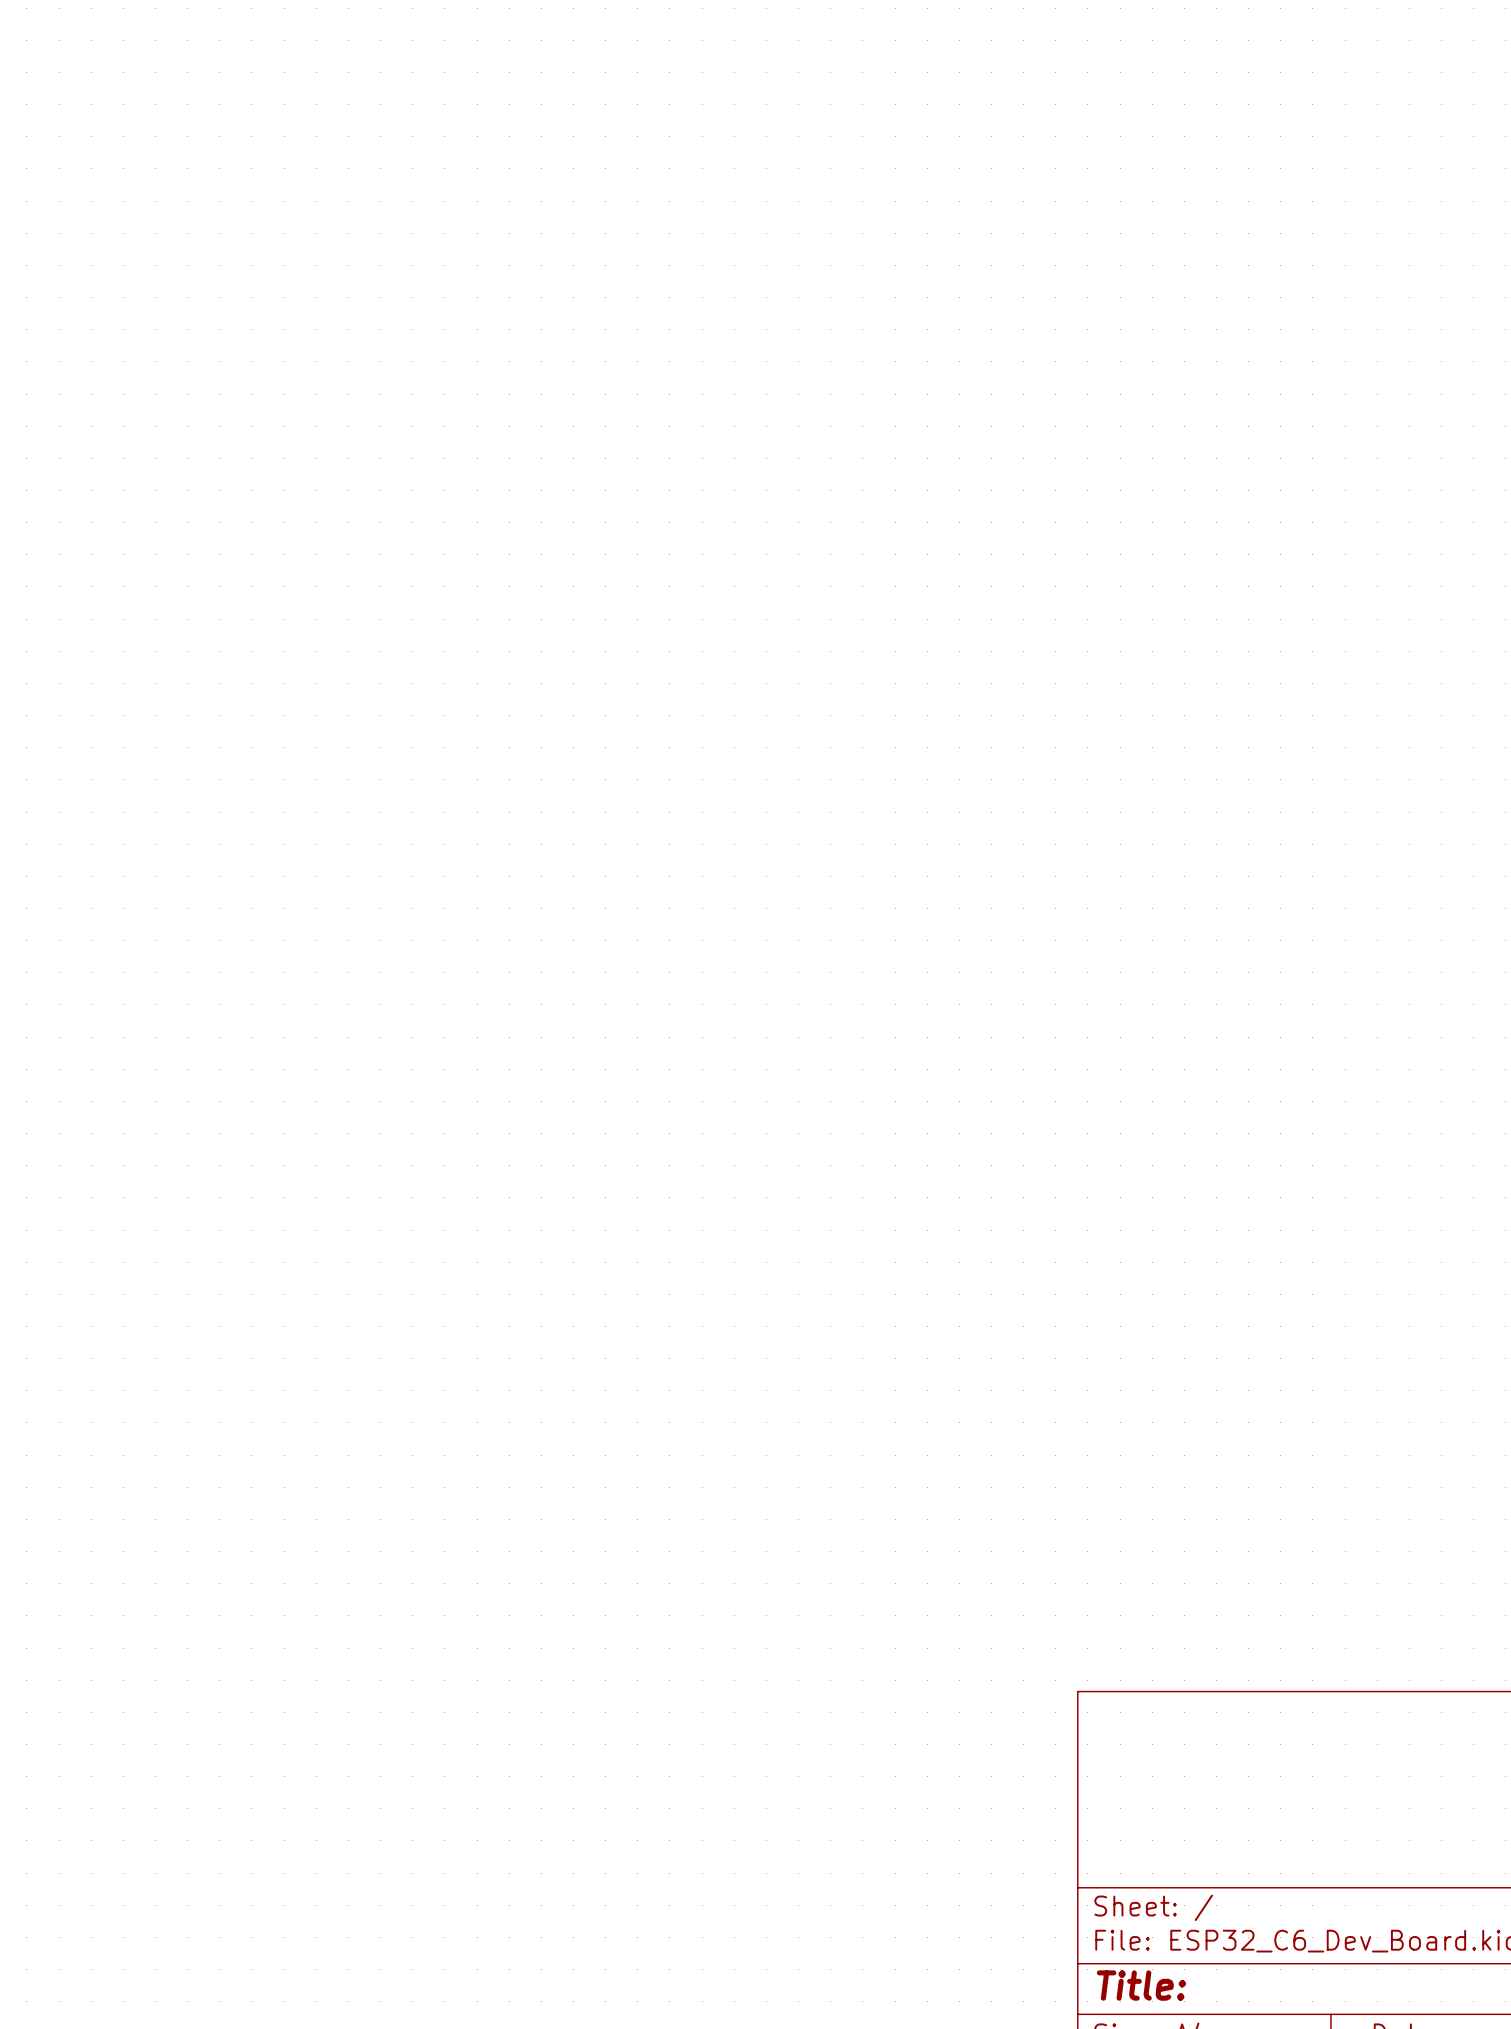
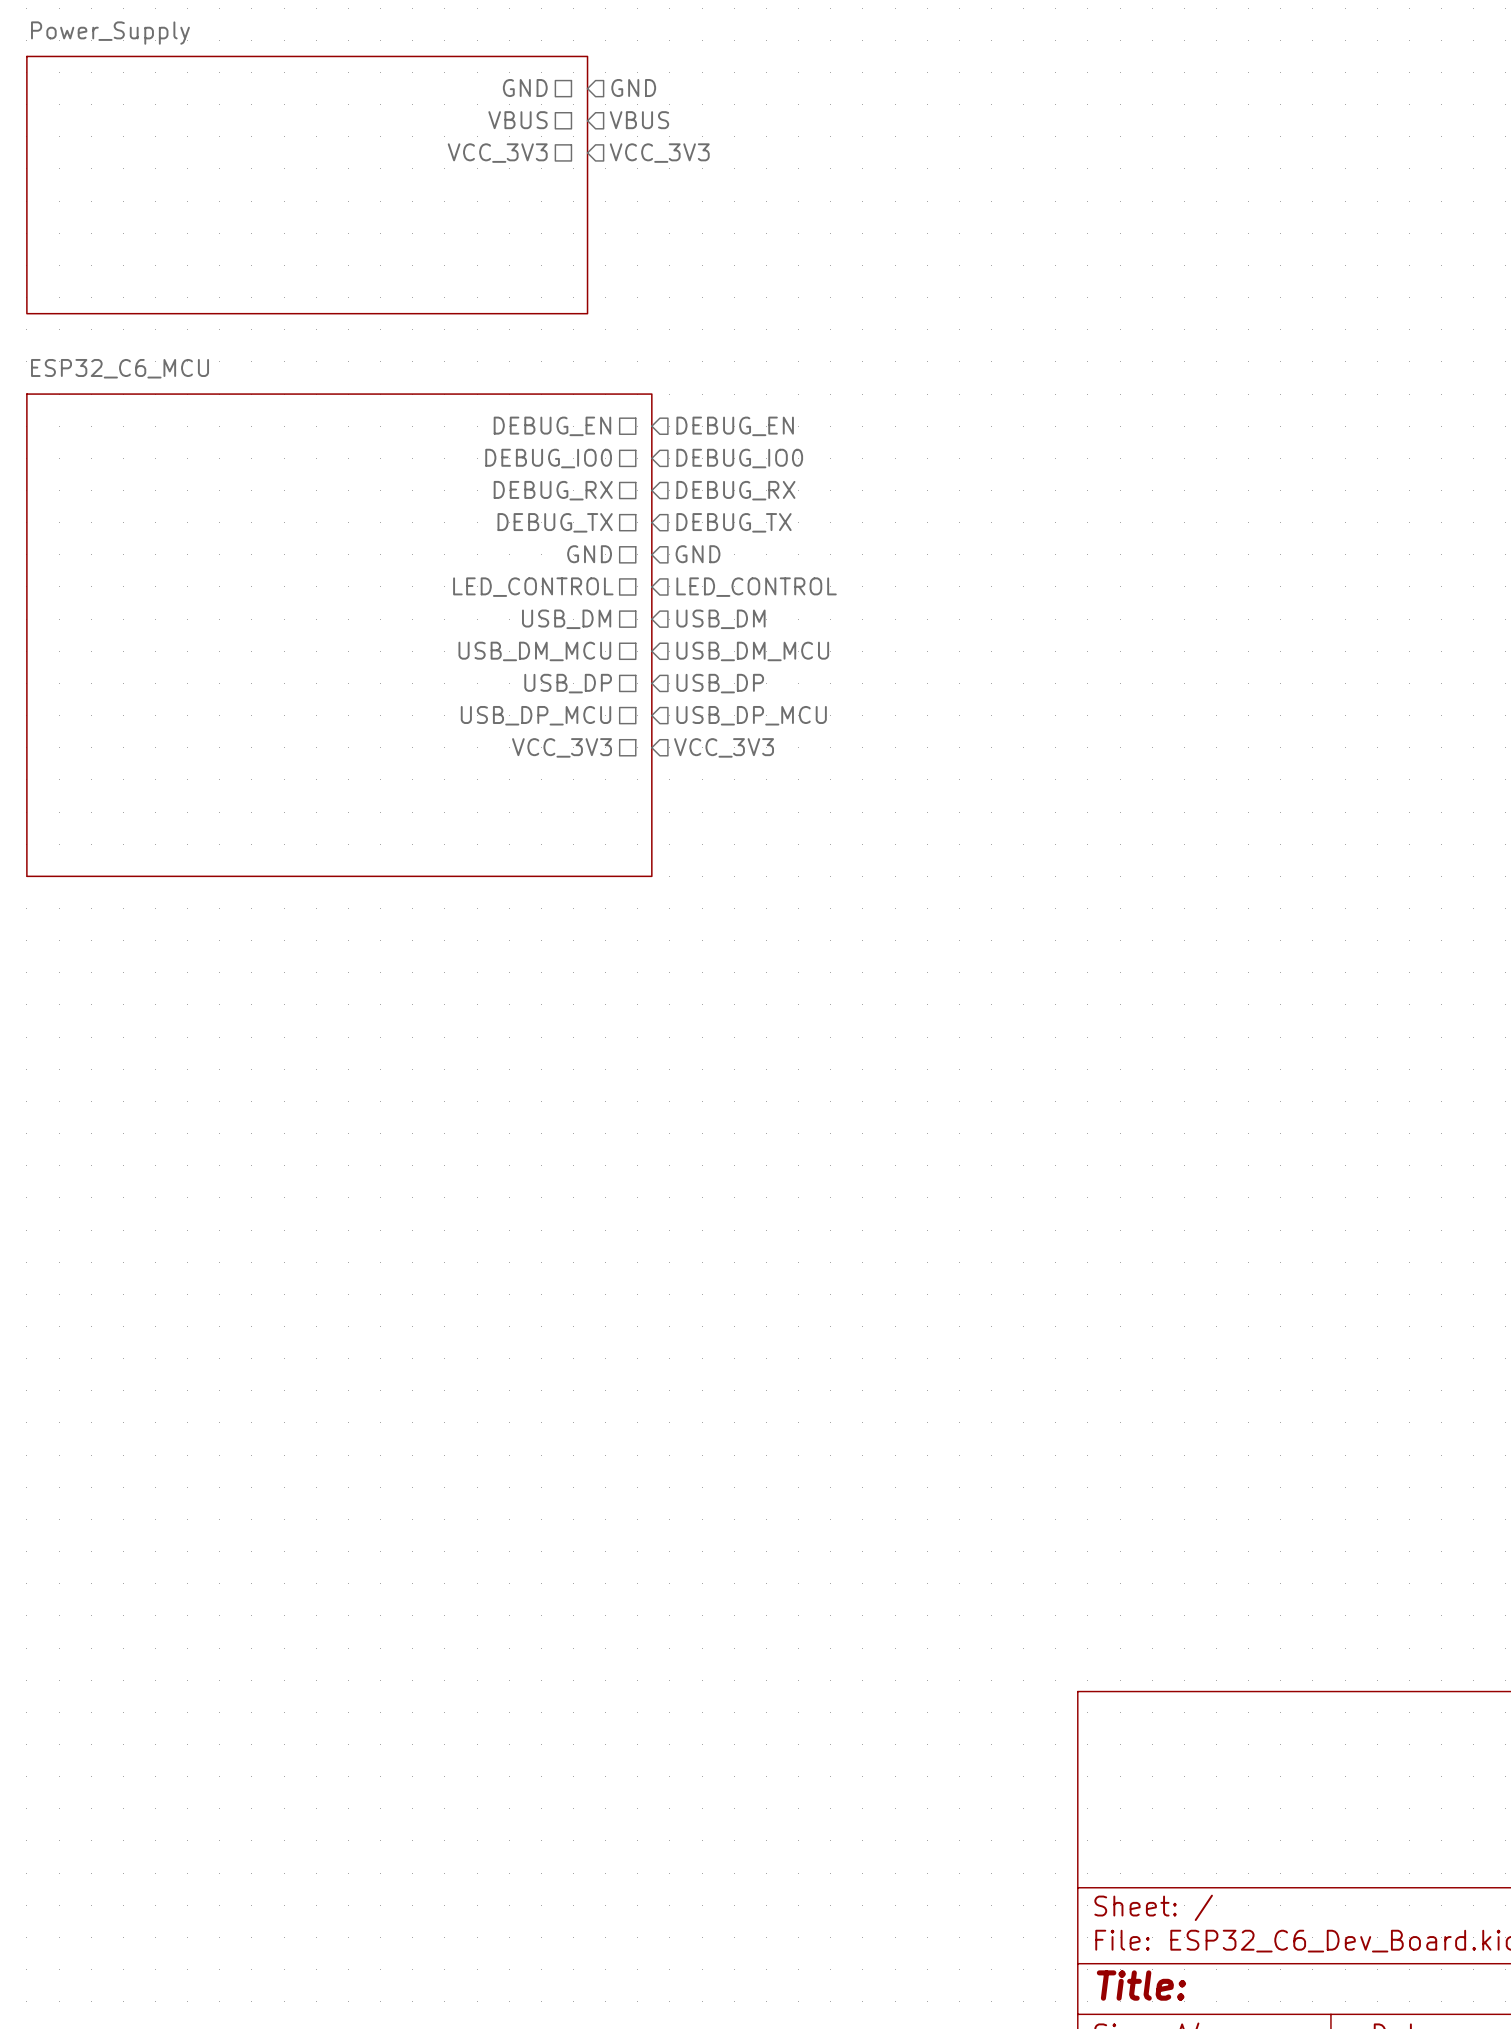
sheet pin: none -> GND (525, 88)
hierarchical label: none -> GND (633, 88)
sheet pin: none -> VBUS (518, 120)
hierarchical label: none -> VBUS (639, 120)
sheet pin: none -> VCC_3V3 (497, 153)
hierarchical label: none -> VCC_3V3 (659, 153)
sheet Power_Supply: none -> (307, 185)
sheet pin: none -> DEBUG_EN (552, 426)
hierarchical label: none -> DEBUG_EN (735, 426)
sheet pin: none -> DEBUG_IO0 (548, 458)
hierarchical label: none -> DEBUG_IO0 (739, 458)
sheet pin: none -> DEBUG_RX (553, 490)
hierarchical label: none -> DEBUG_RX (735, 490)
sheet pin: none -> DEBUG_TX (555, 522)
hierarchical label: none -> DEBUG_TX (734, 522)
sheet pin: none -> GND (589, 554)
hierarchical label: none -> GND (698, 554)
sheet pin: none -> LED_CONTROL (533, 587)
hierarchical label: none -> LED_CONTROL (756, 587)
sheet pin: none -> USB_DM (566, 619)
hierarchical label: none -> USB_DM (720, 619)
sheet ESP32_C6_MCU: none -> (339, 635)
sheet pin: none -> USB_DM_MCU (534, 651)
hierarchical label: none -> USB_DM_MCU (752, 651)
sheet pin: none -> USB_DP (568, 683)
hierarchical label: none -> USB_DP (720, 683)
sheet pin: none -> USB_DP_MCU (535, 715)
hierarchical label: none -> USB_DP_MCU (751, 715)
sheet pin: none -> VCC_3V3 (562, 747)
hierarchical label: none -> VCC_3V3 (724, 747)

